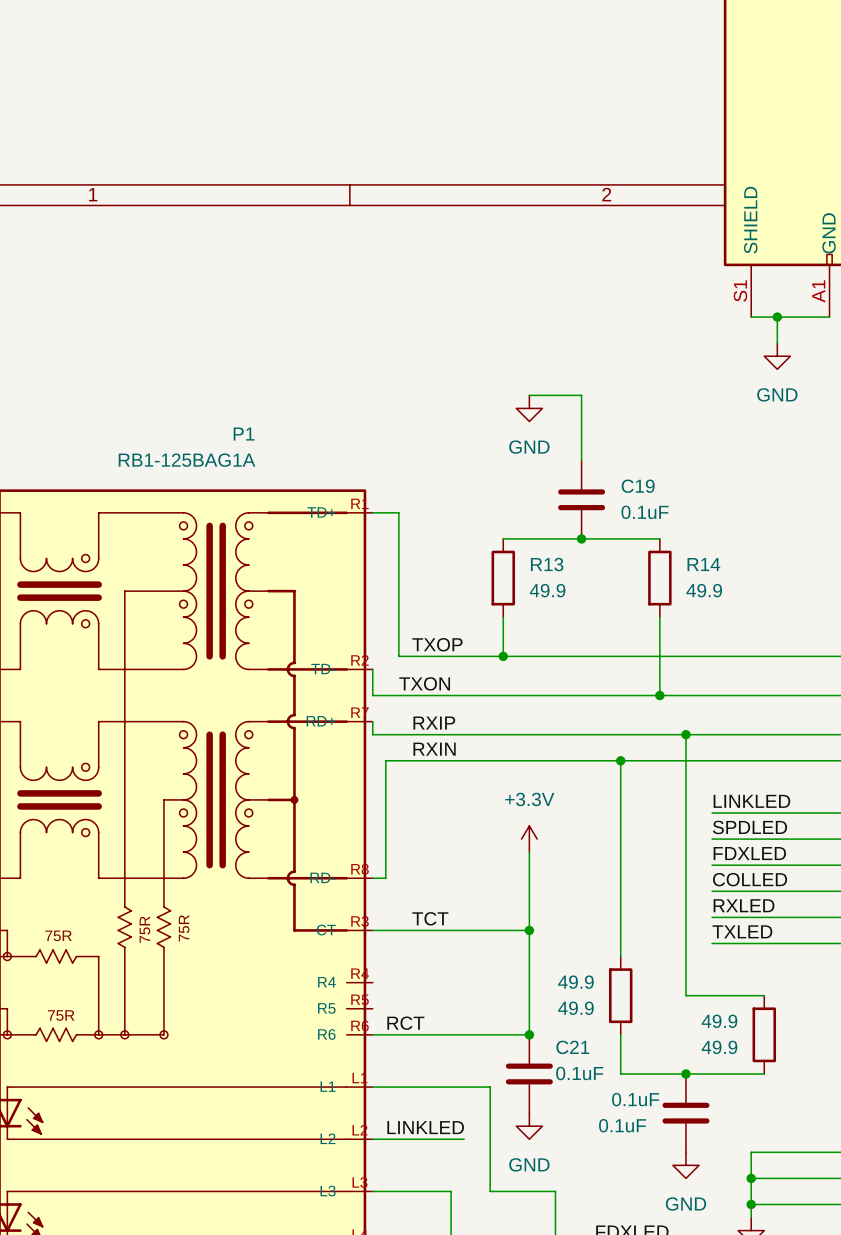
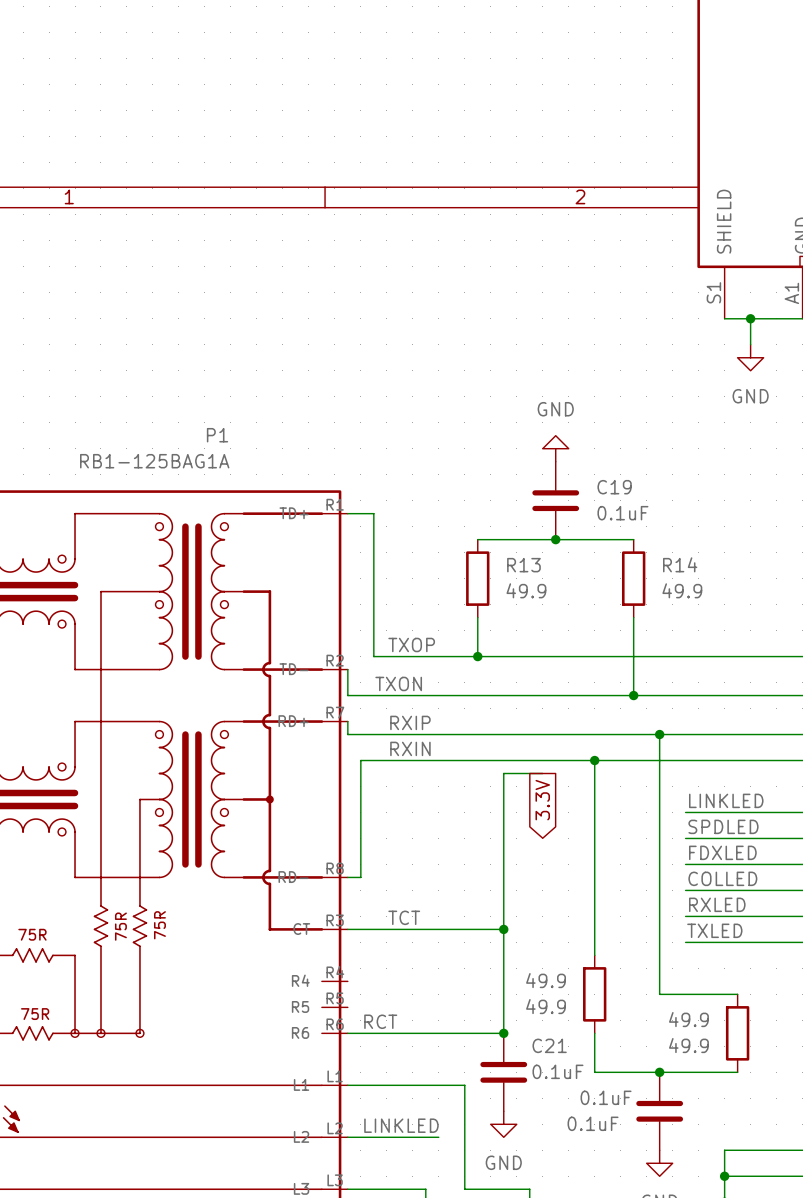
wire: (529, 395) (581, 395) (581, 460) -> none
power symbol rotation: 0° (529, 408) -> 180° (555, 448)
power symbol position: GND (529, 408) -> GND (555, 448)
wire: none -> (542, 773) (503, 773) (503, 851)
global label: none -> 3.3V (542, 800)
power symbol: +3.3V (529, 839) -> none

